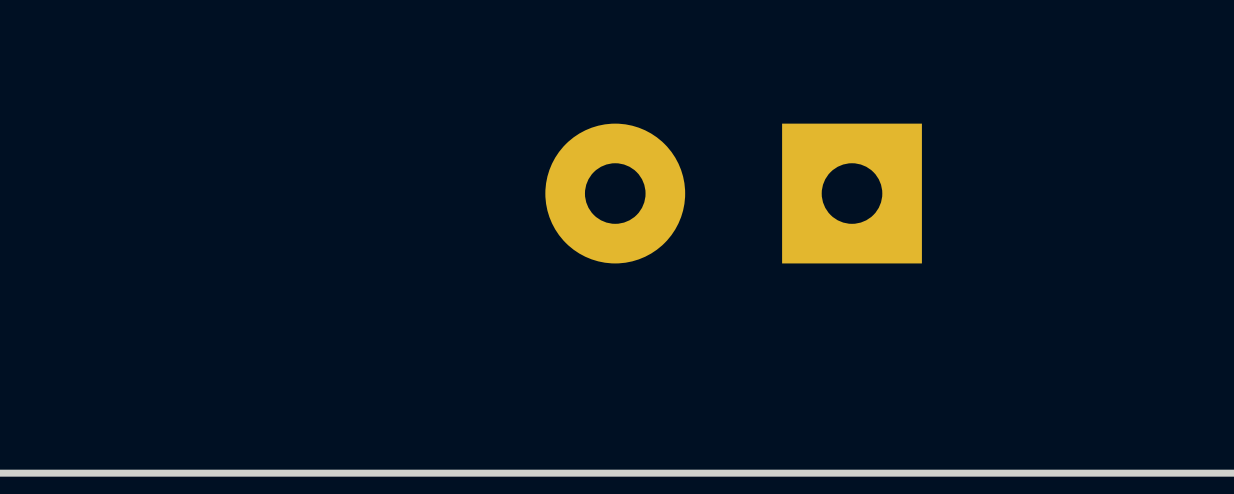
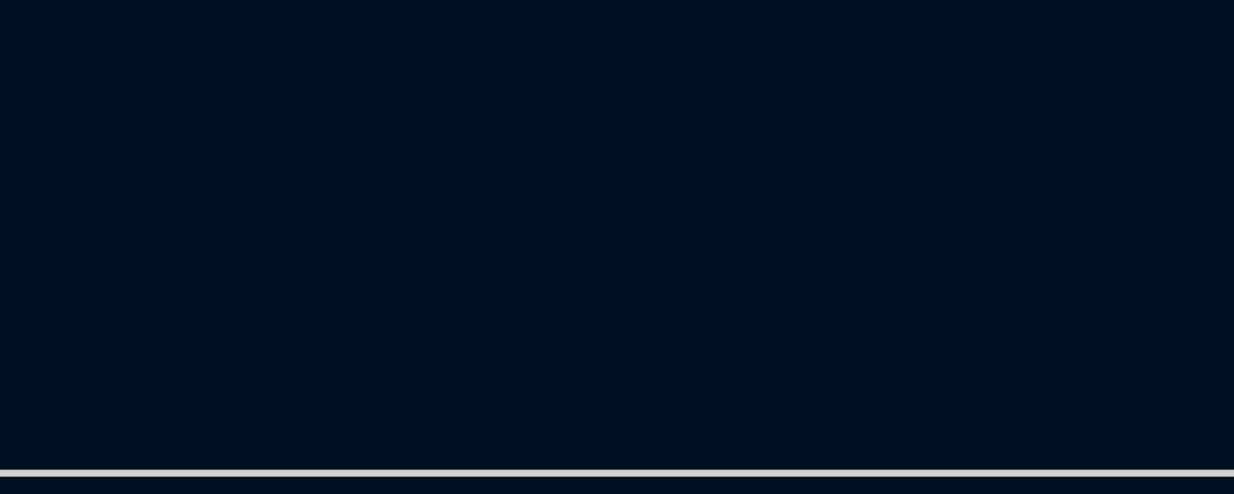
part: (733, 193) -> none

